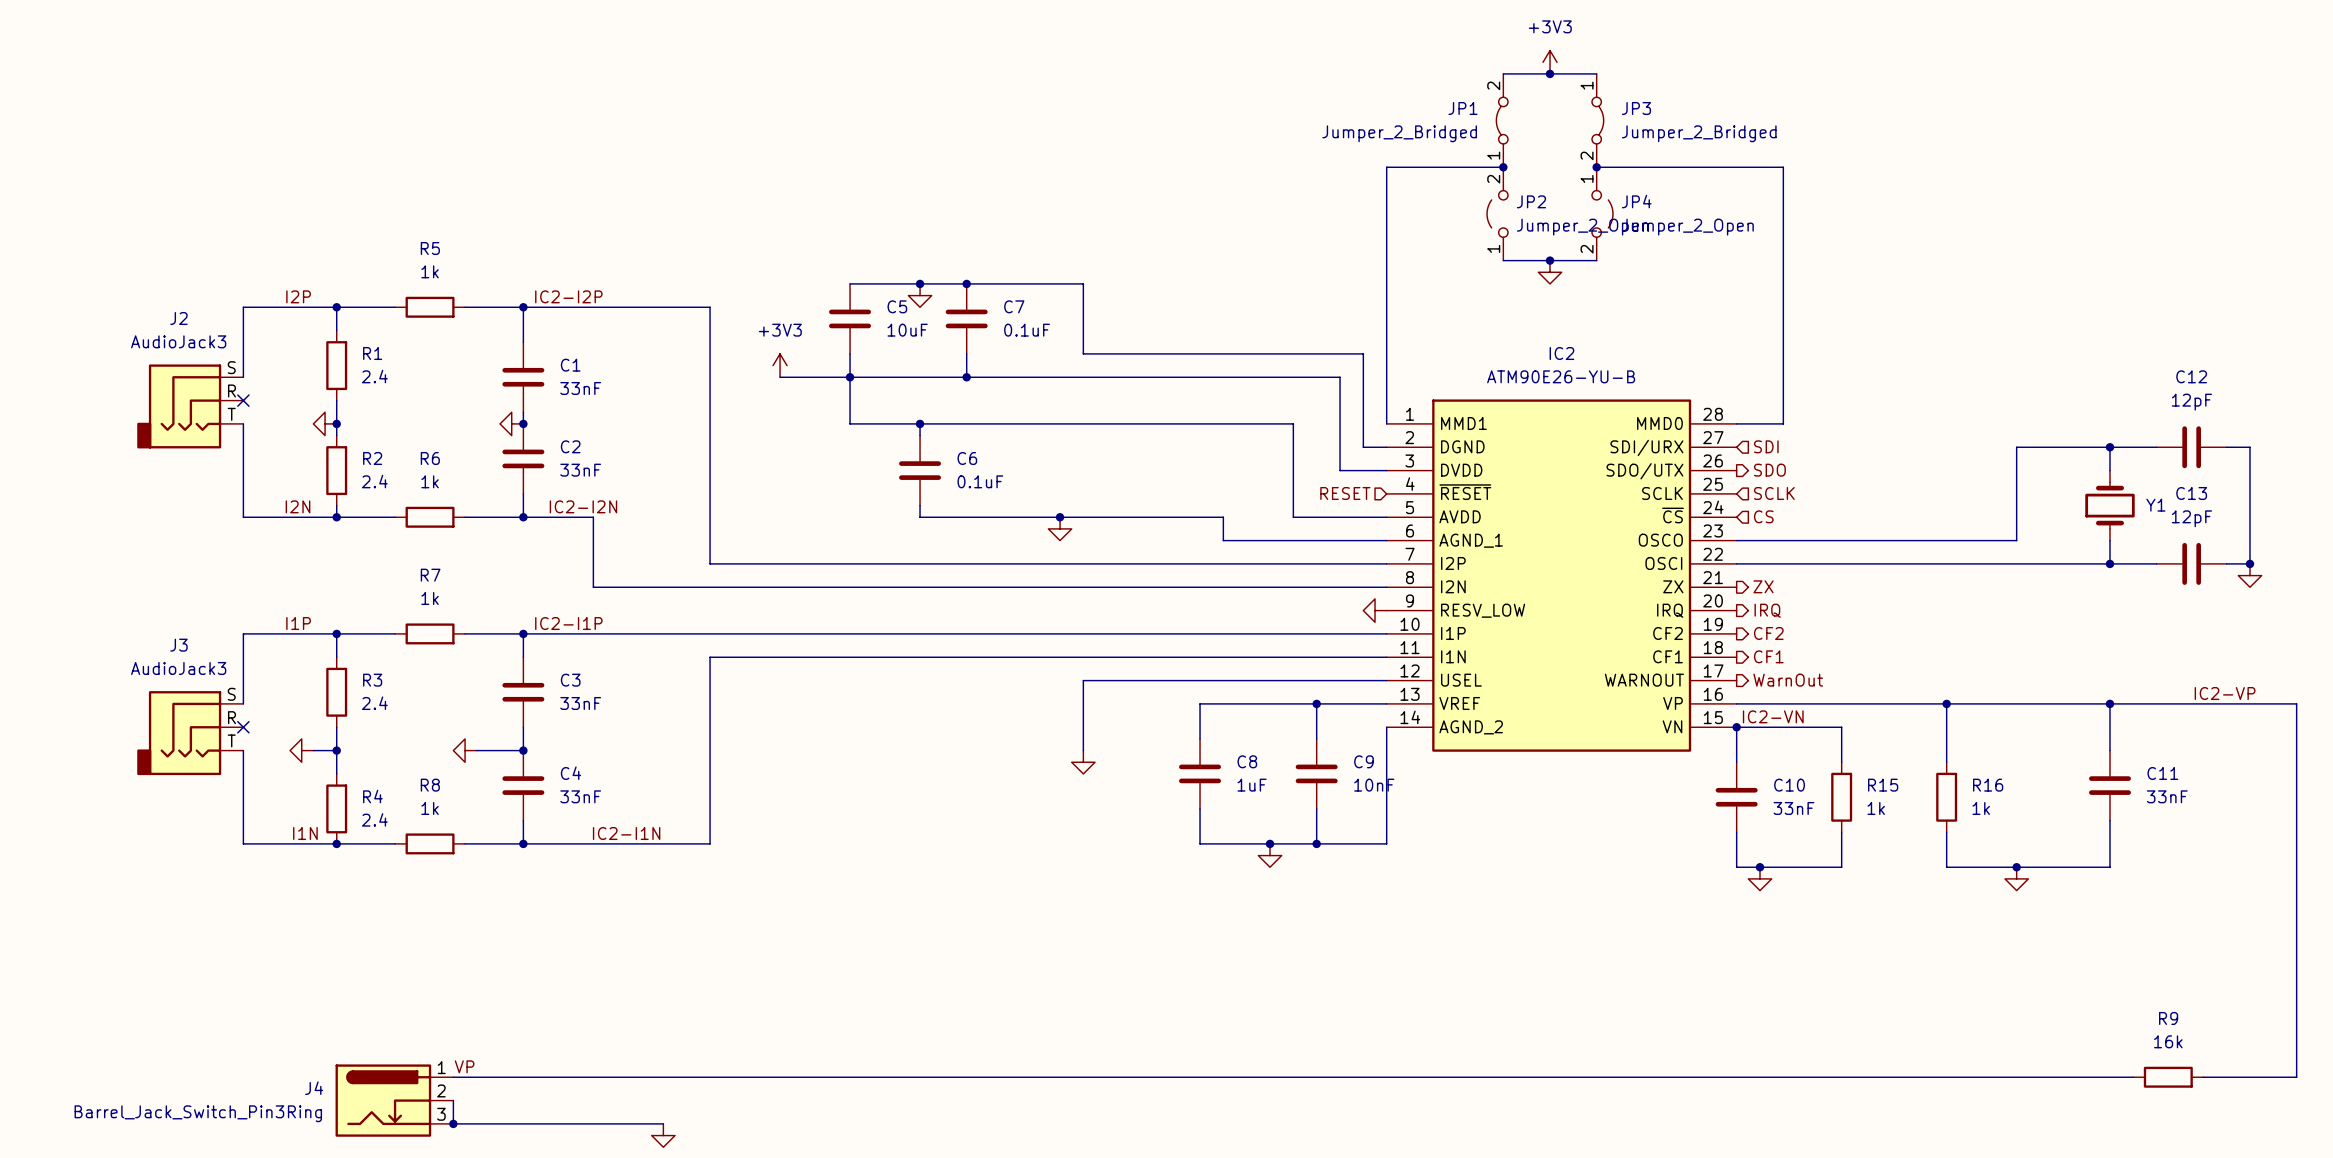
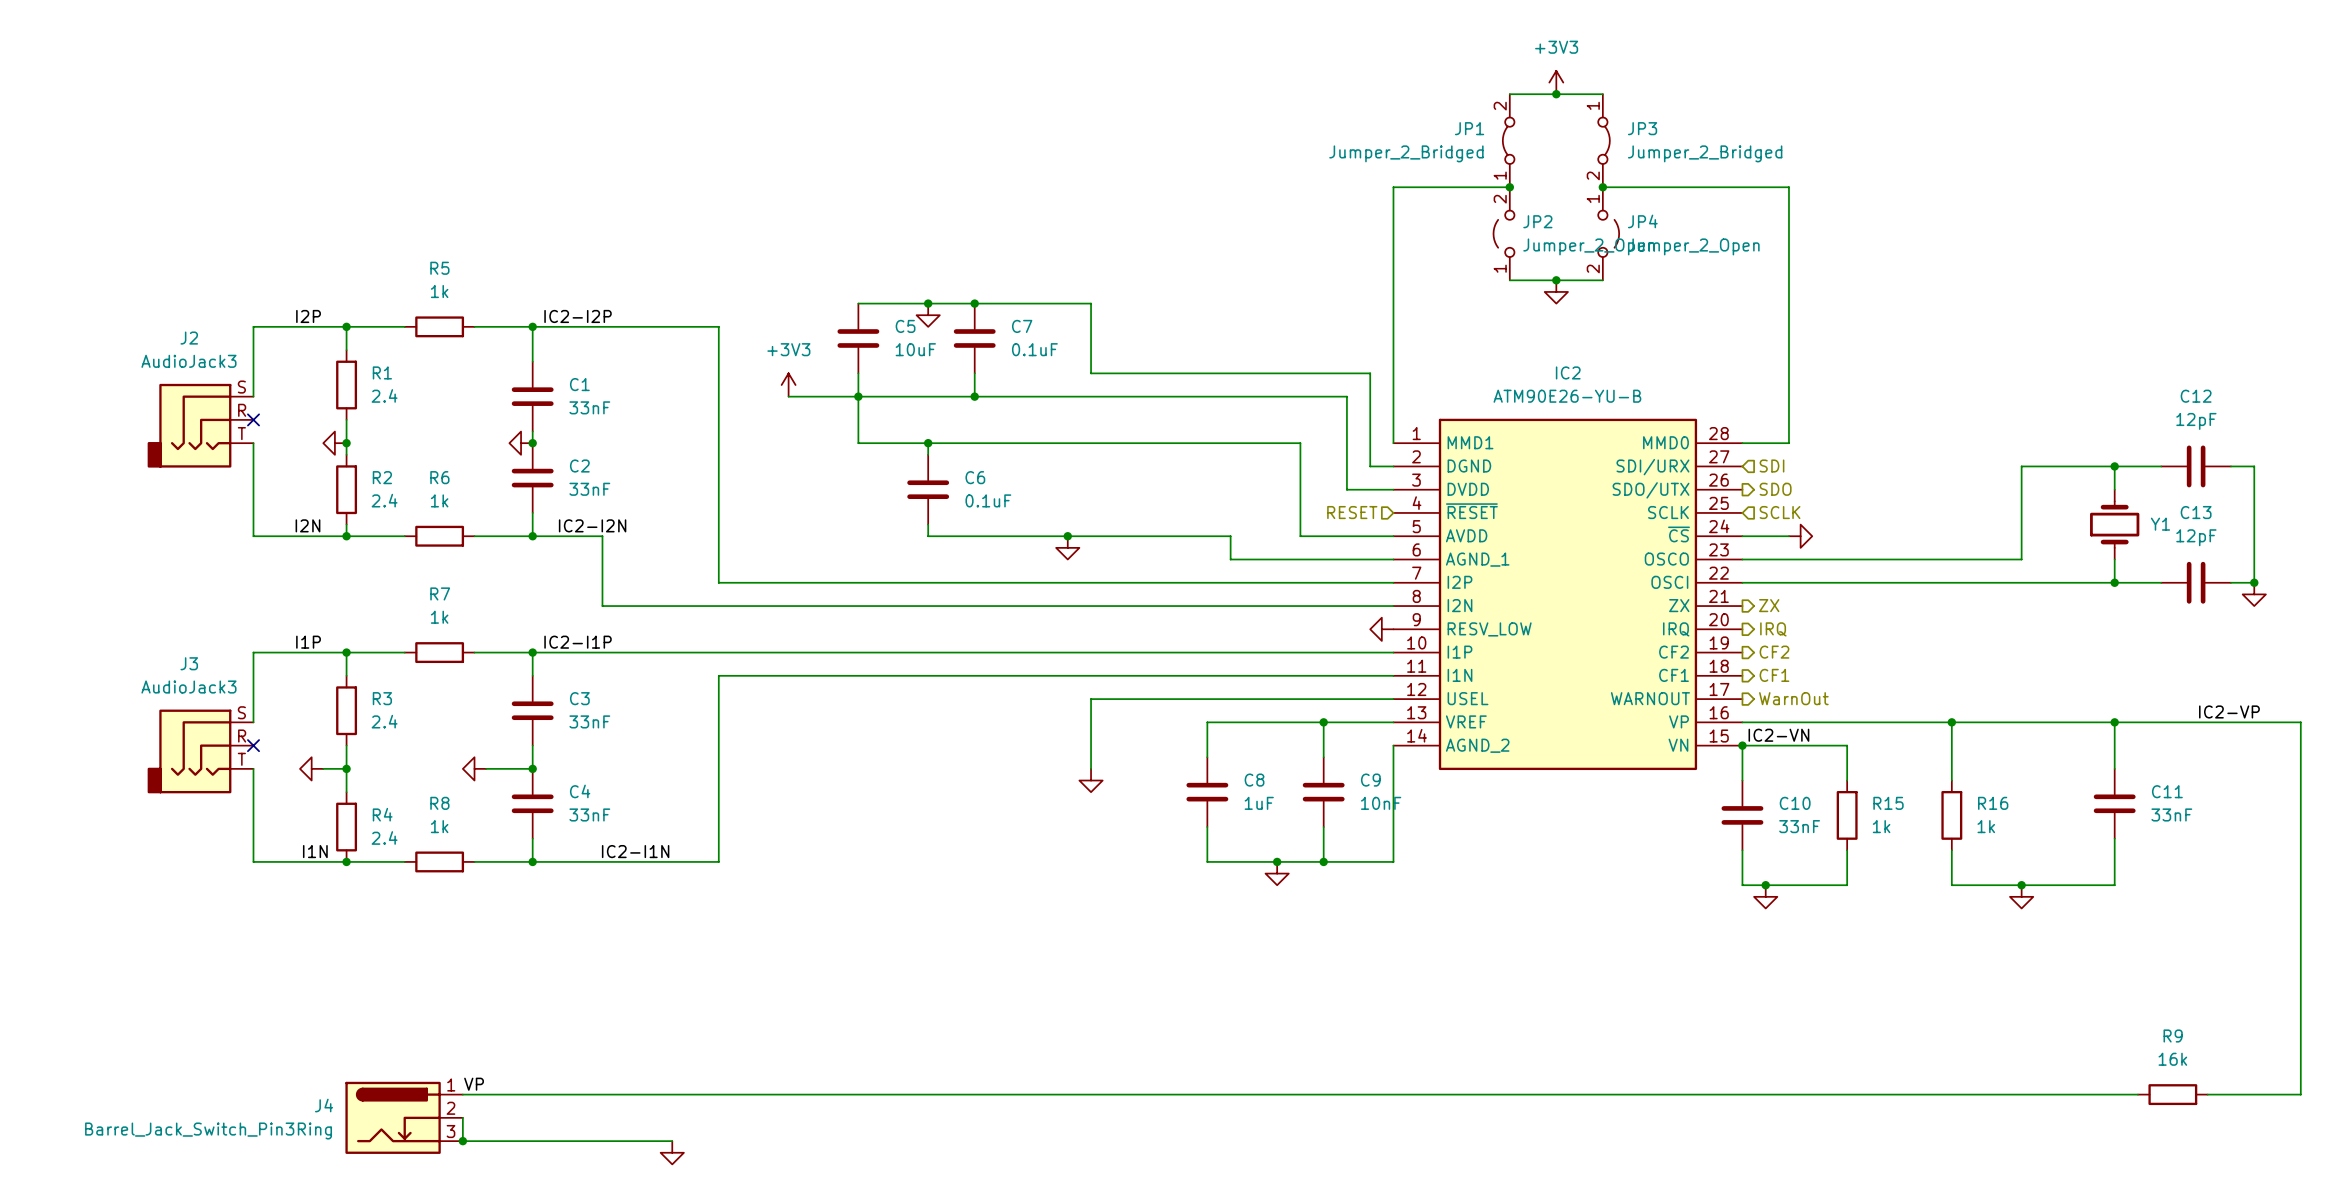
hierarchical label: CS (1763, 516) -> none
wire: none -> (1742, 536) (1788, 536)
power symbol: none -> (1800, 536)

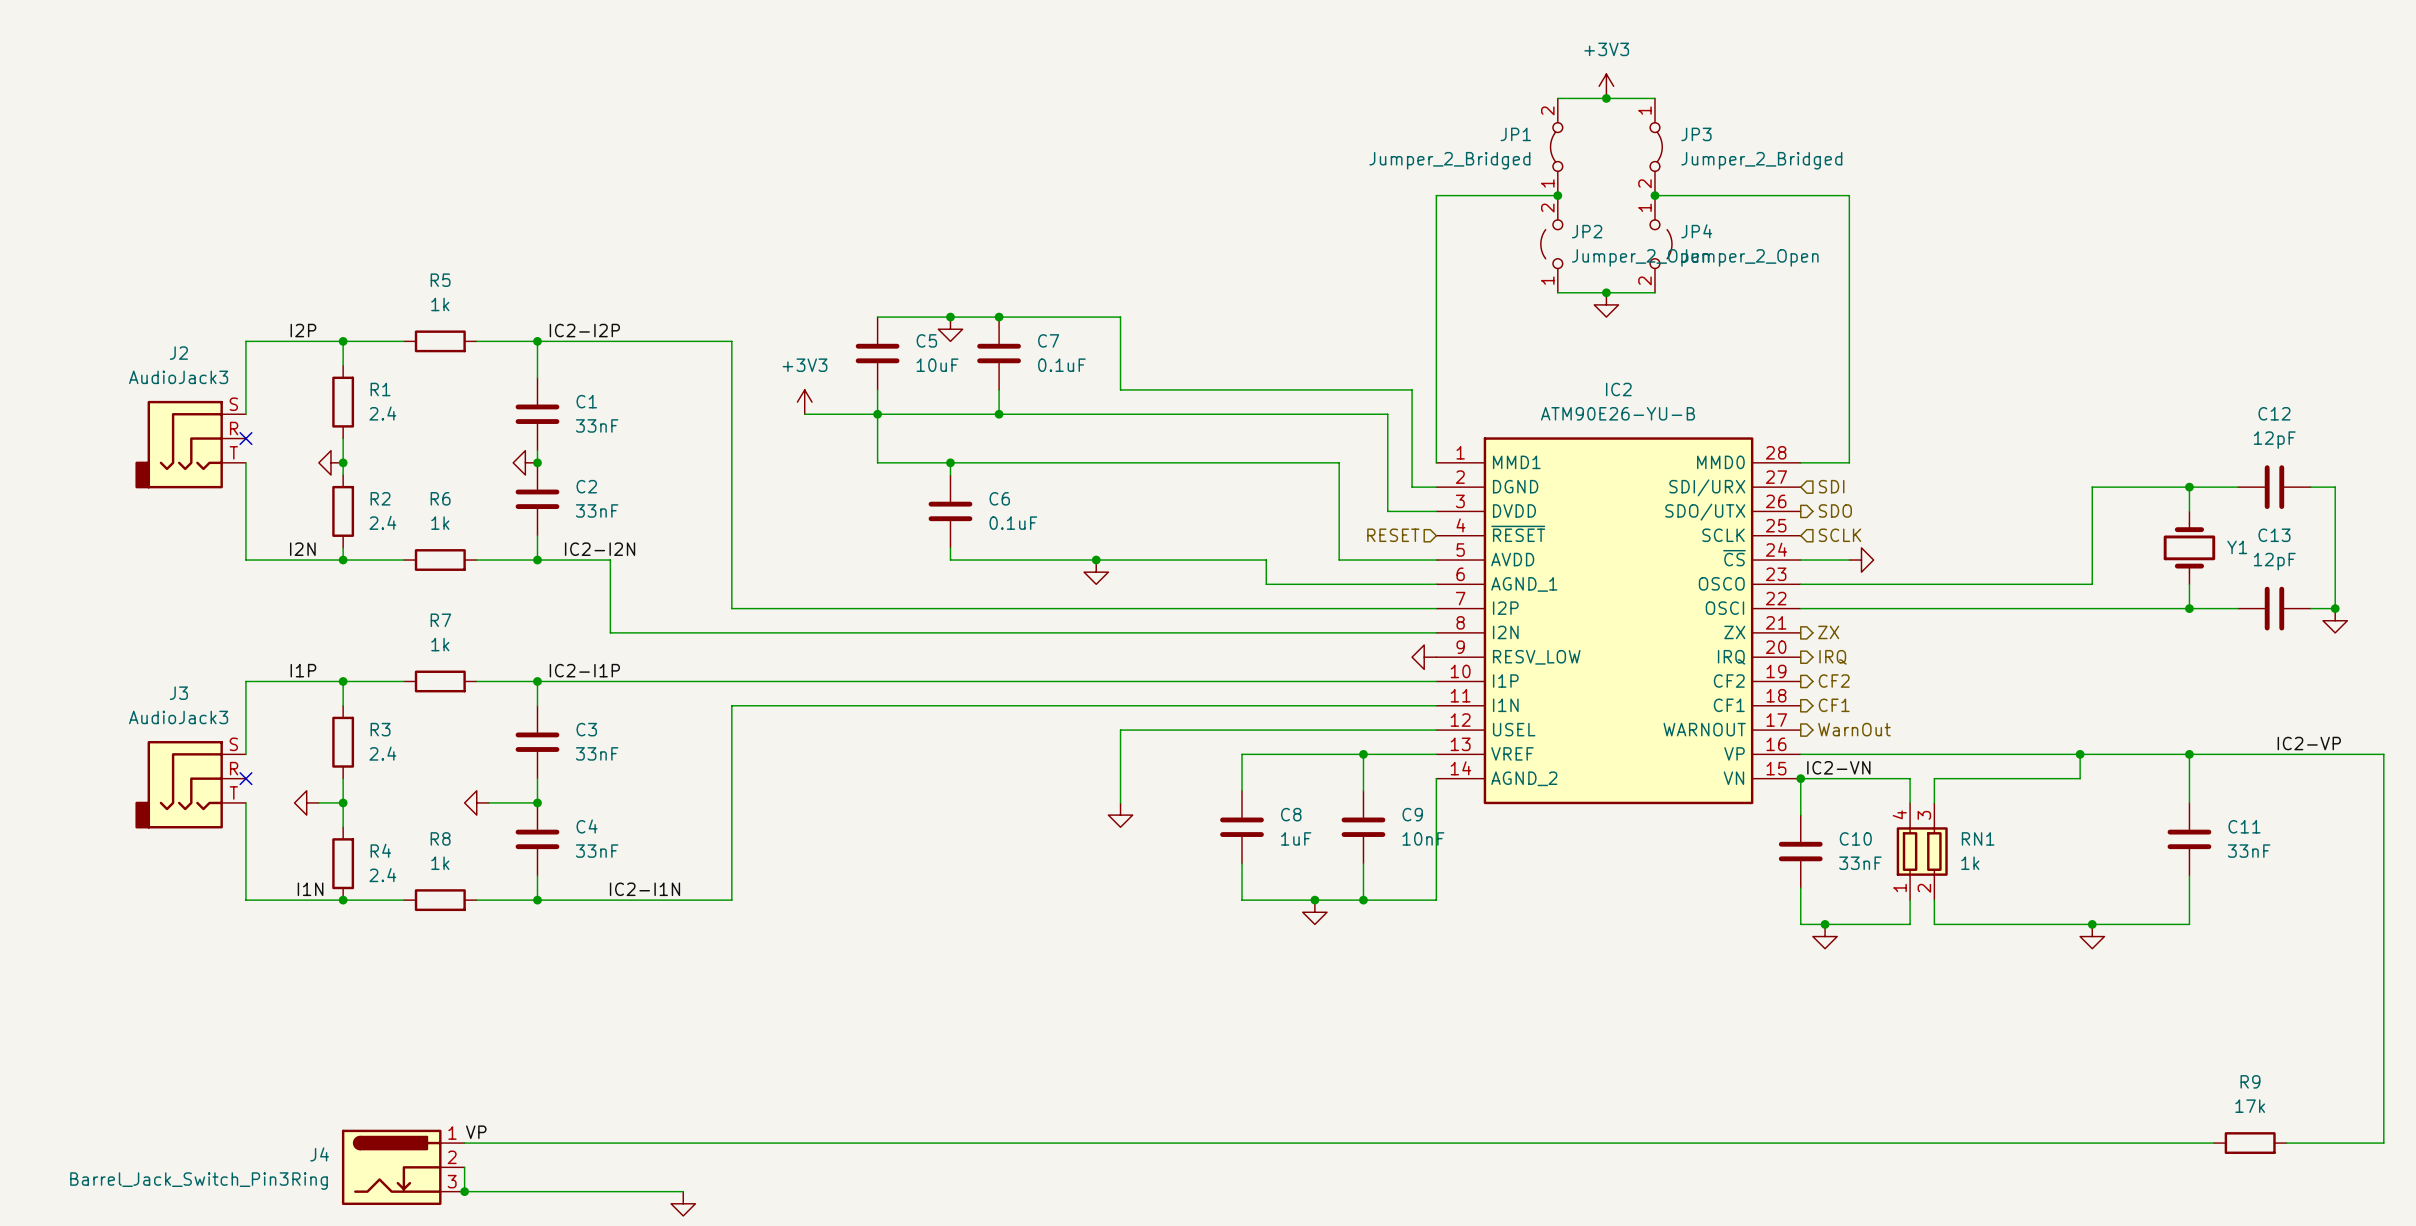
wire: (1951, 722) (1951, 780) -> none
junction: (1951, 722) -> none
wire: none -> (2080, 754) (2080, 778) (1934, 778) (1934, 802)
junction: none -> (2080, 754)
R15: 1k (1847, 815) -> none
RN1: none -> 1k (1922, 851)
R16: 1k (1951, 815) -> none
wire: (1951, 850) (1951, 885) -> (1934, 900) (1934, 924) (2019, 924)
R9 value: 16k (2172, 1059) -> 17k (2250, 1106)

